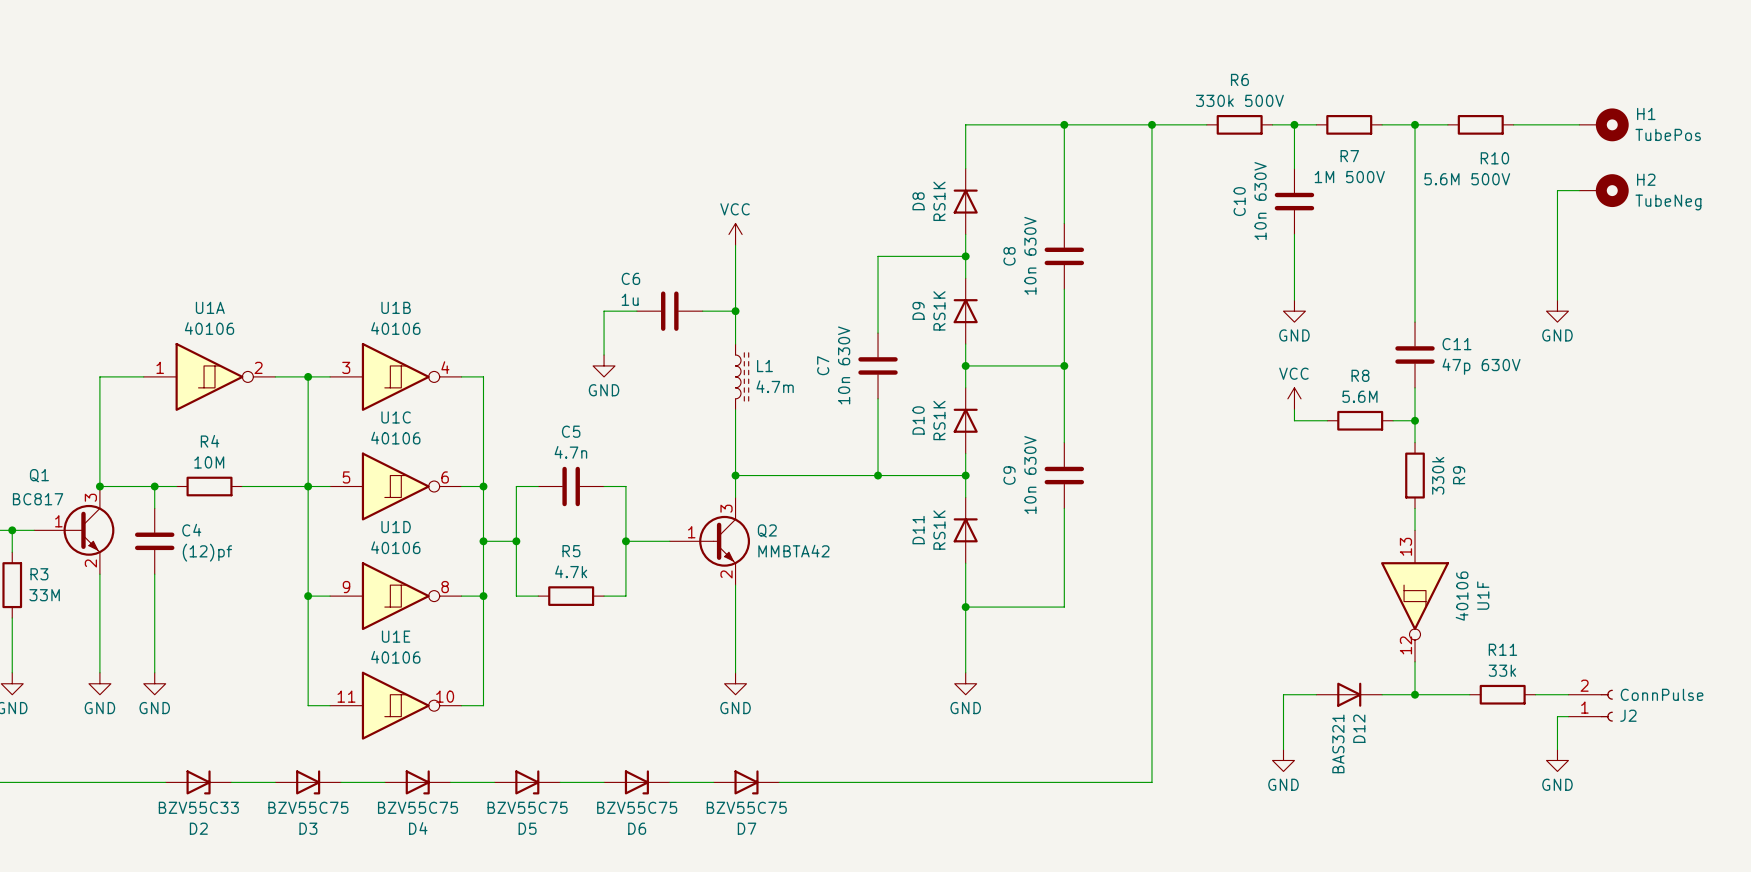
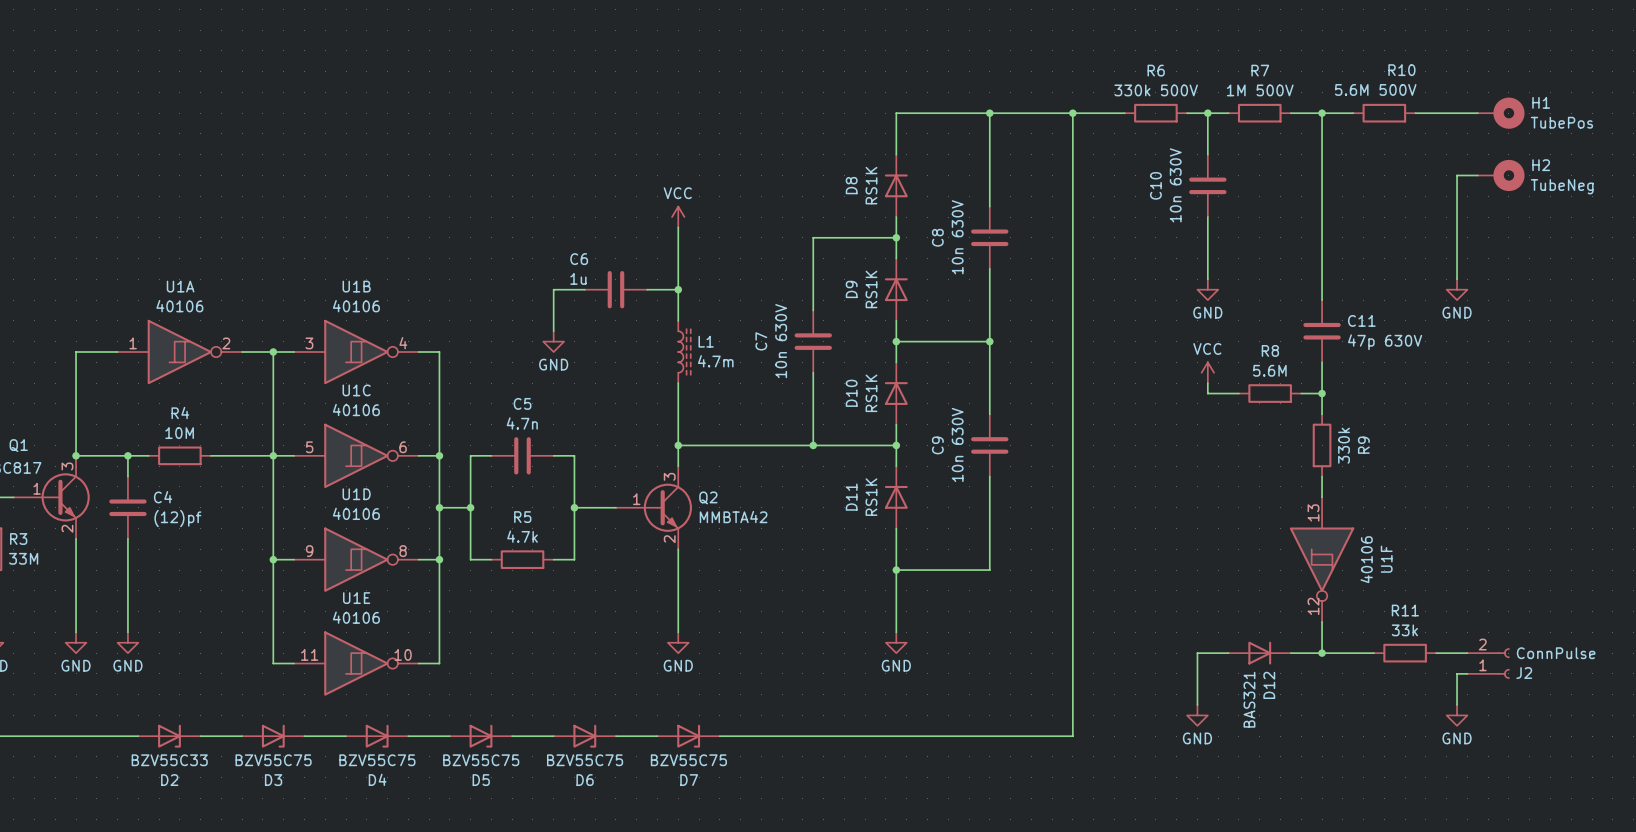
R7 name position: R7 (1349, 156) -> R7 (1260, 70)
R10 name position: R10 (1494, 158) -> R10 (1401, 70)
R7 value position: 1M 500V (1349, 177) -> 1M 500V (1260, 90)
R10 value position: 5.6M 500V (1467, 179) -> 5.6M 500V (1375, 89)

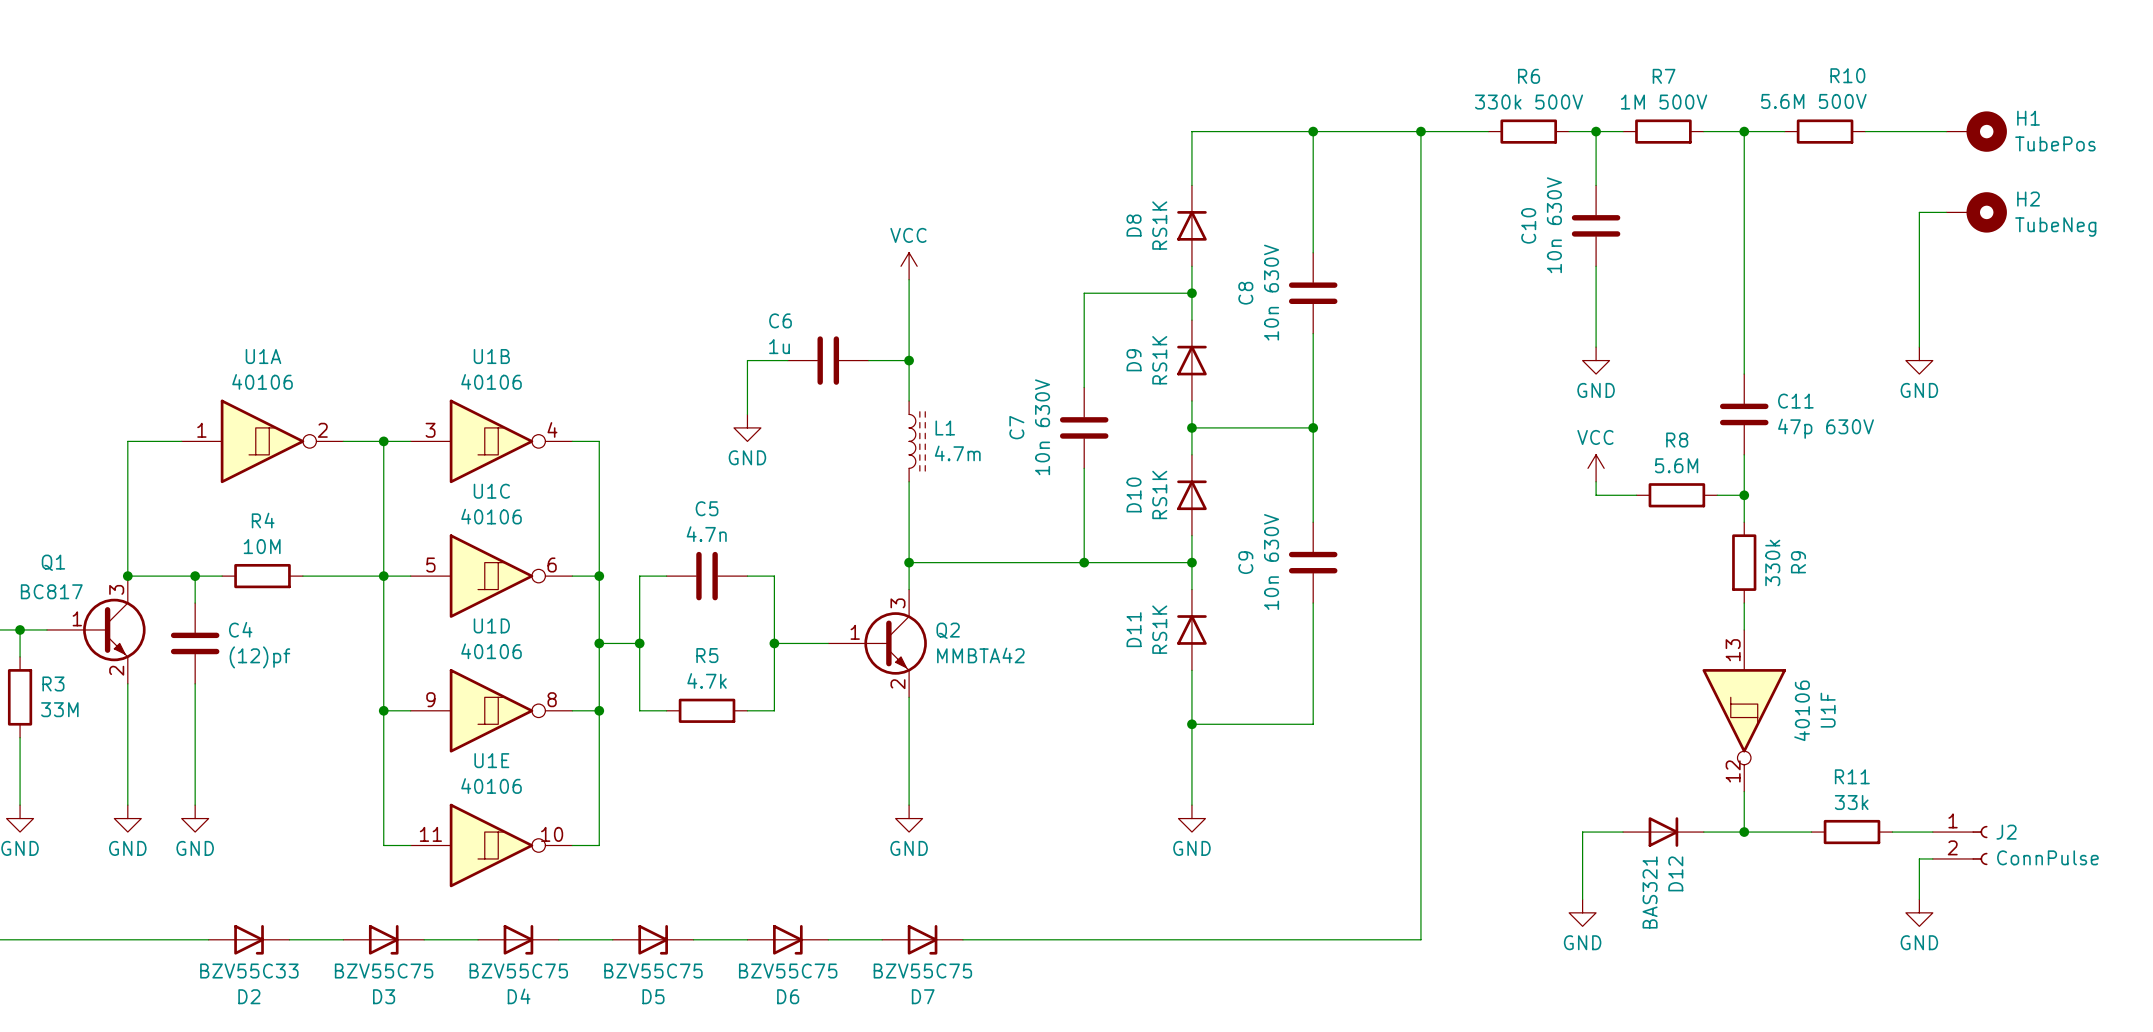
J2 flip: as is (1503, 663) -> up-down (1979, 845)

